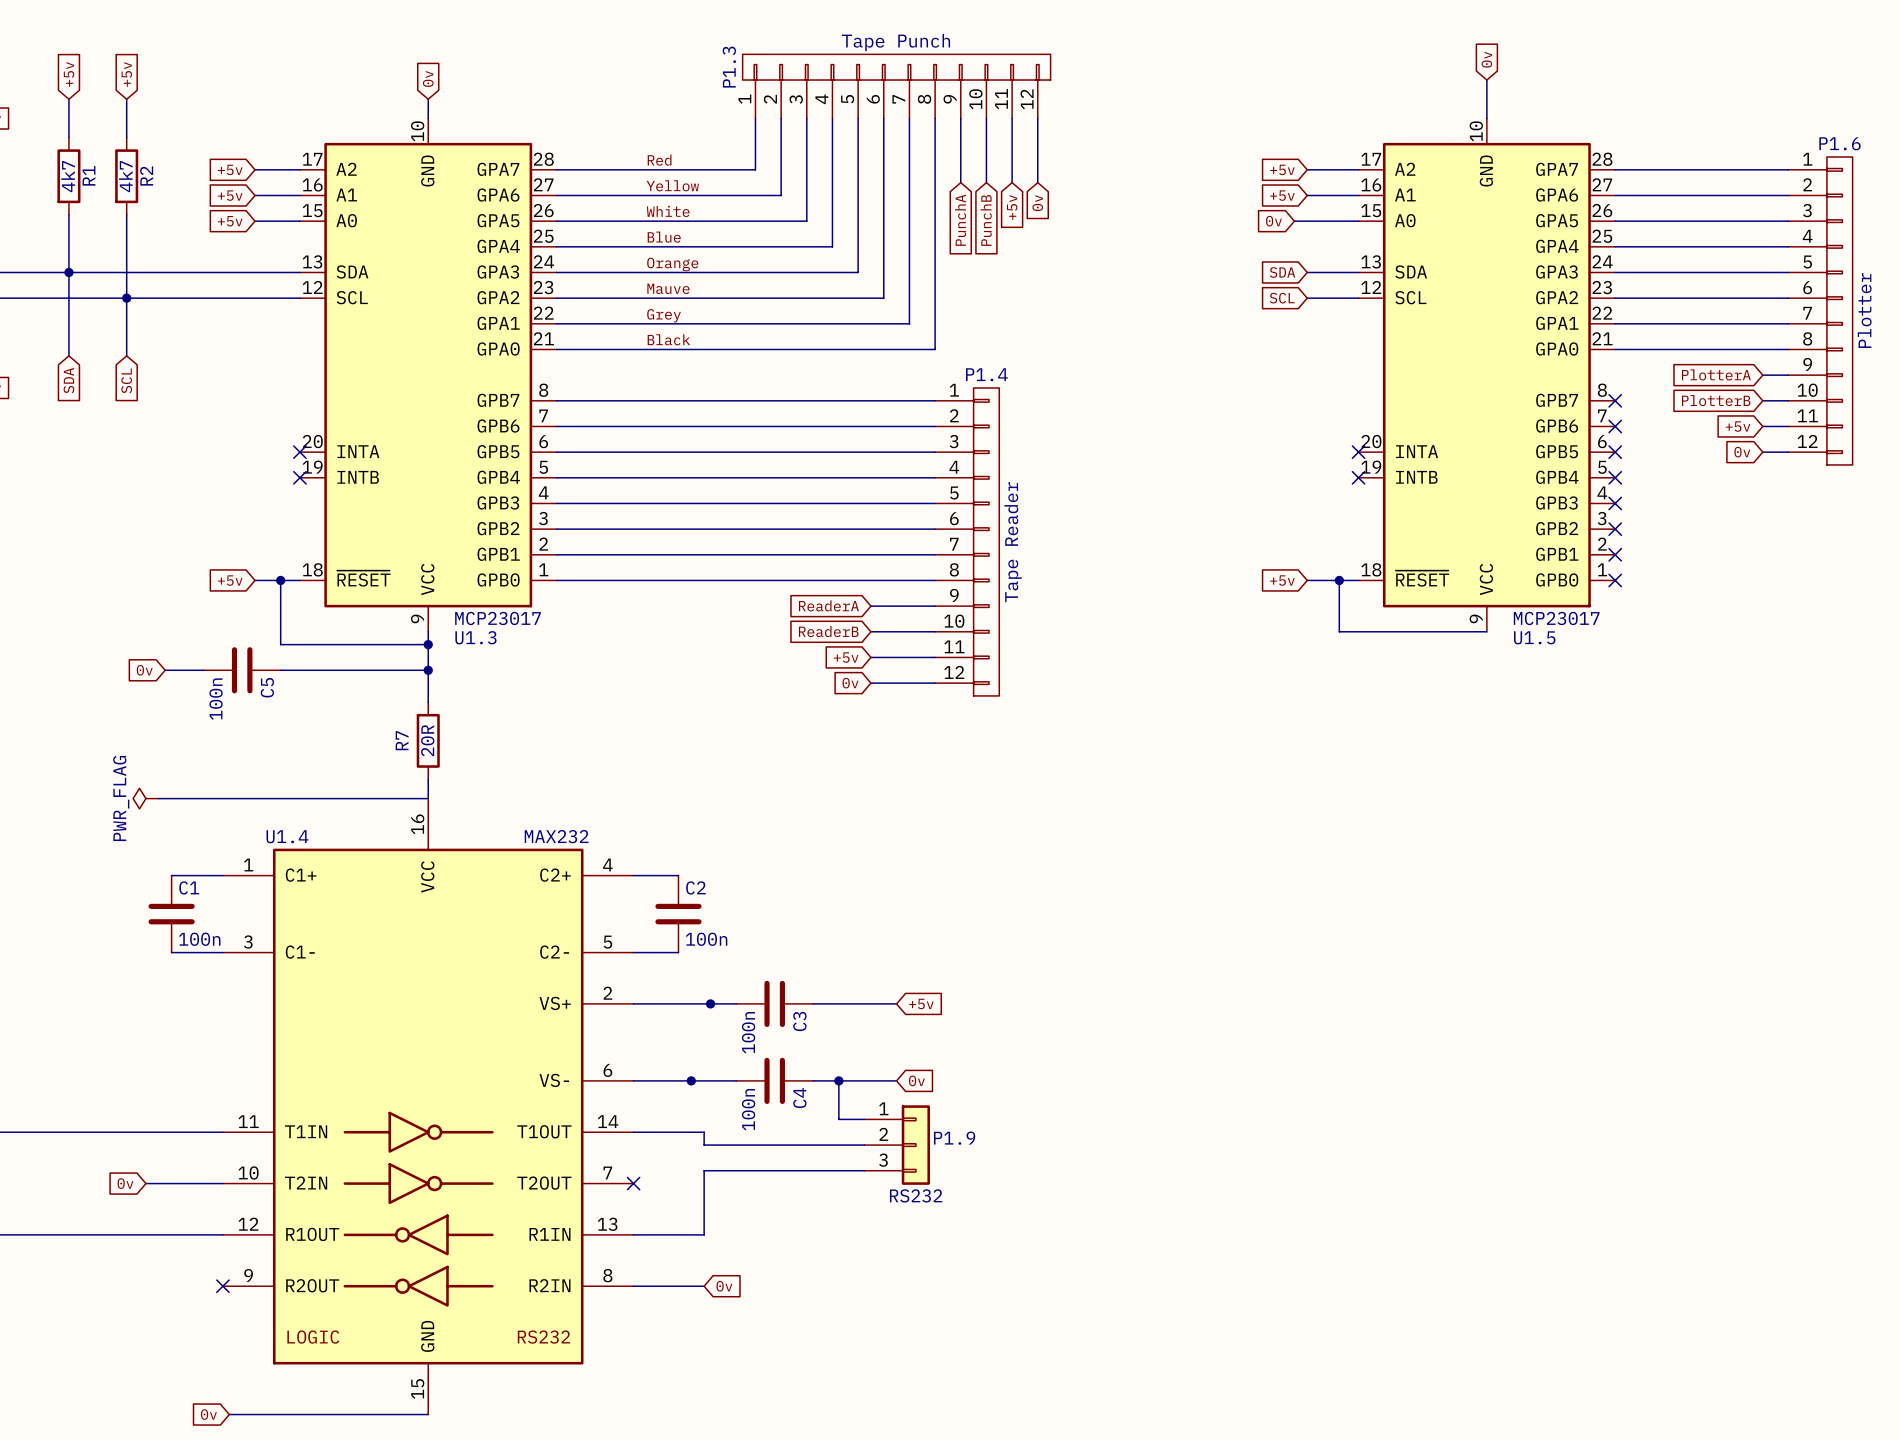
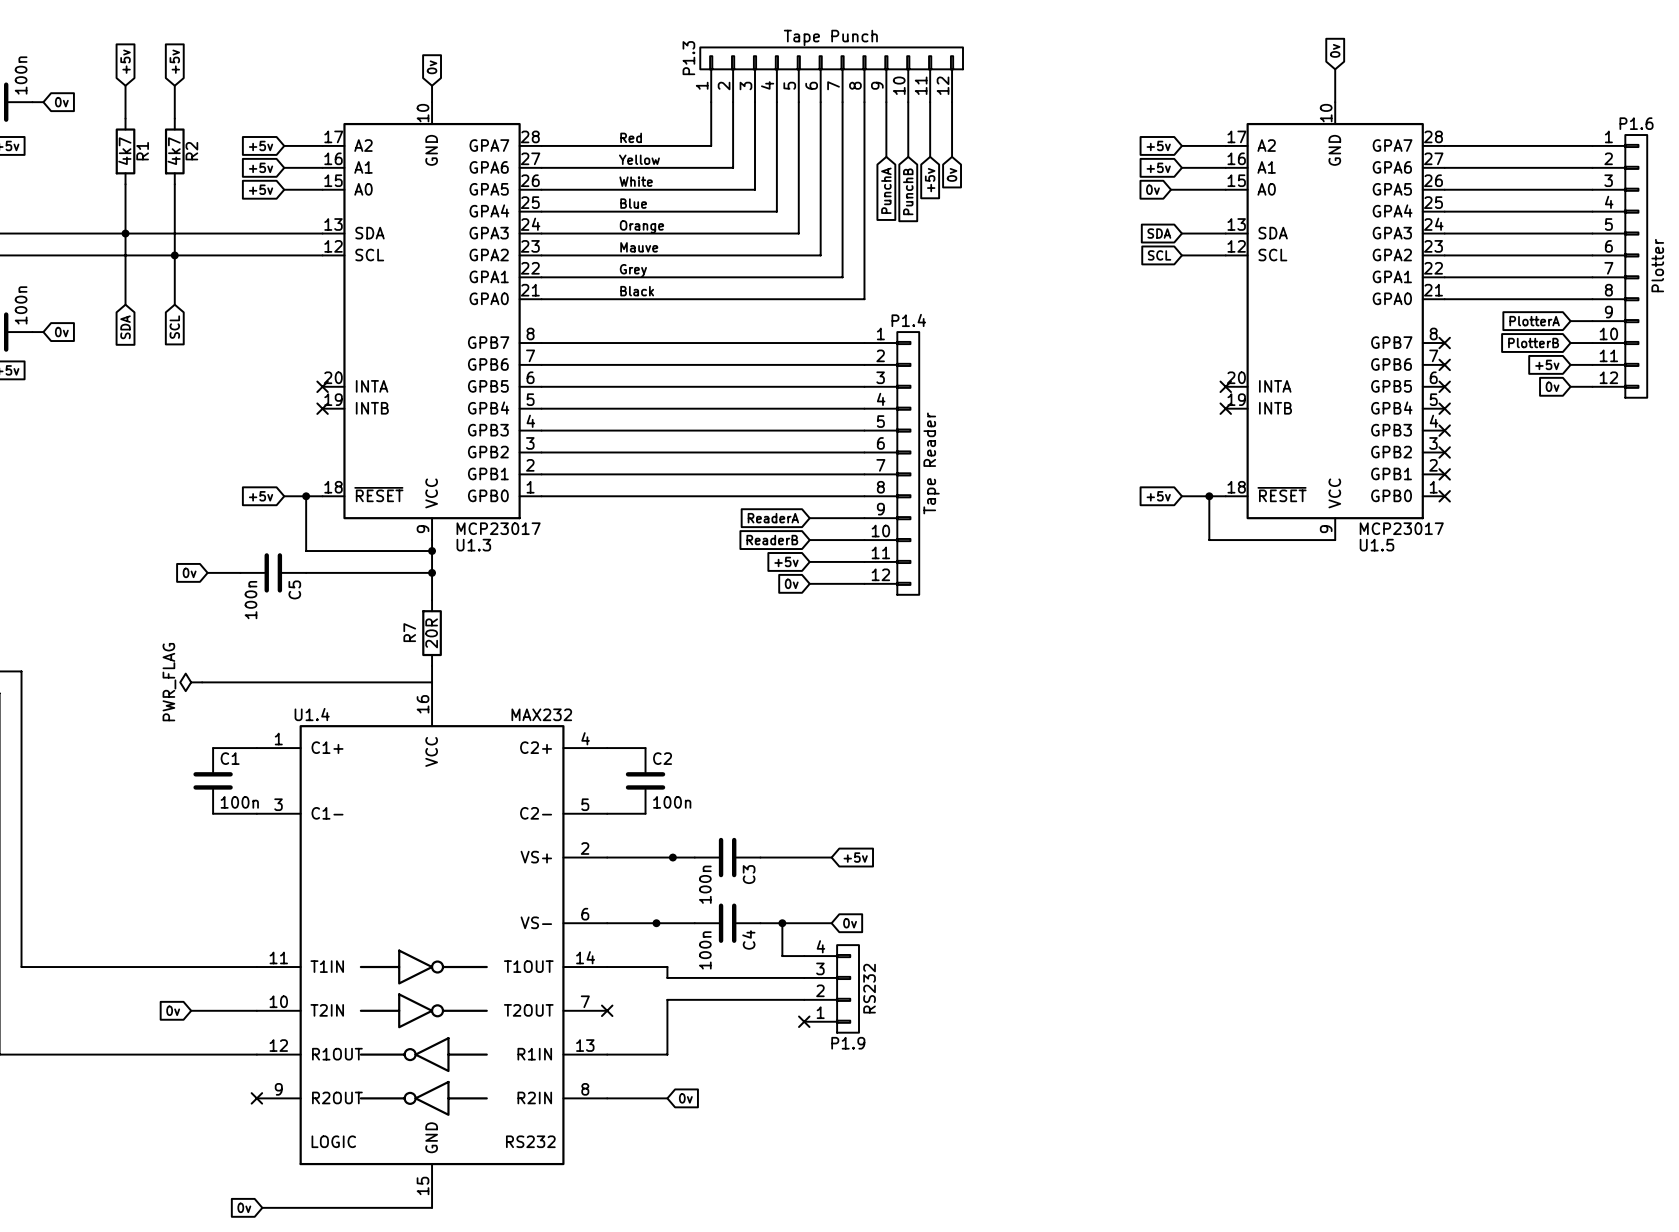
P1.9 symbol: [864, 1105, 930, 1185] -> [804, 945, 860, 1033]
P1.9 name position: P1.9 (954, 1138) -> P1.9 (848, 1043)
P1.9 value position: RS232 (916, 1195) -> RS232 (869, 988)
no-connect mark: none -> (804, 1021)

